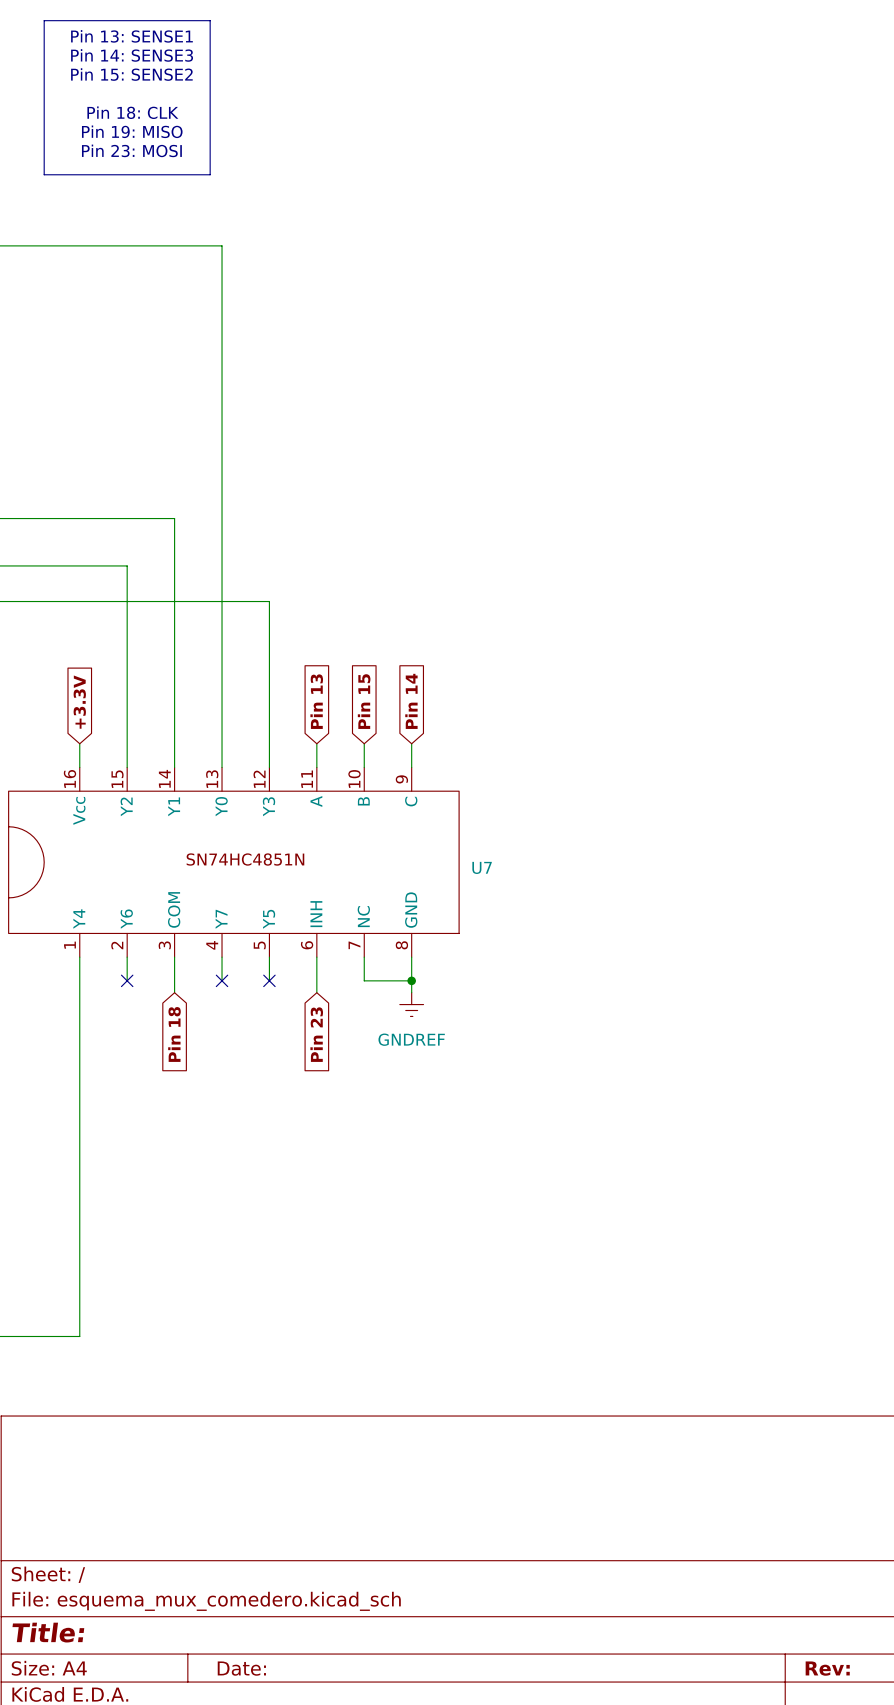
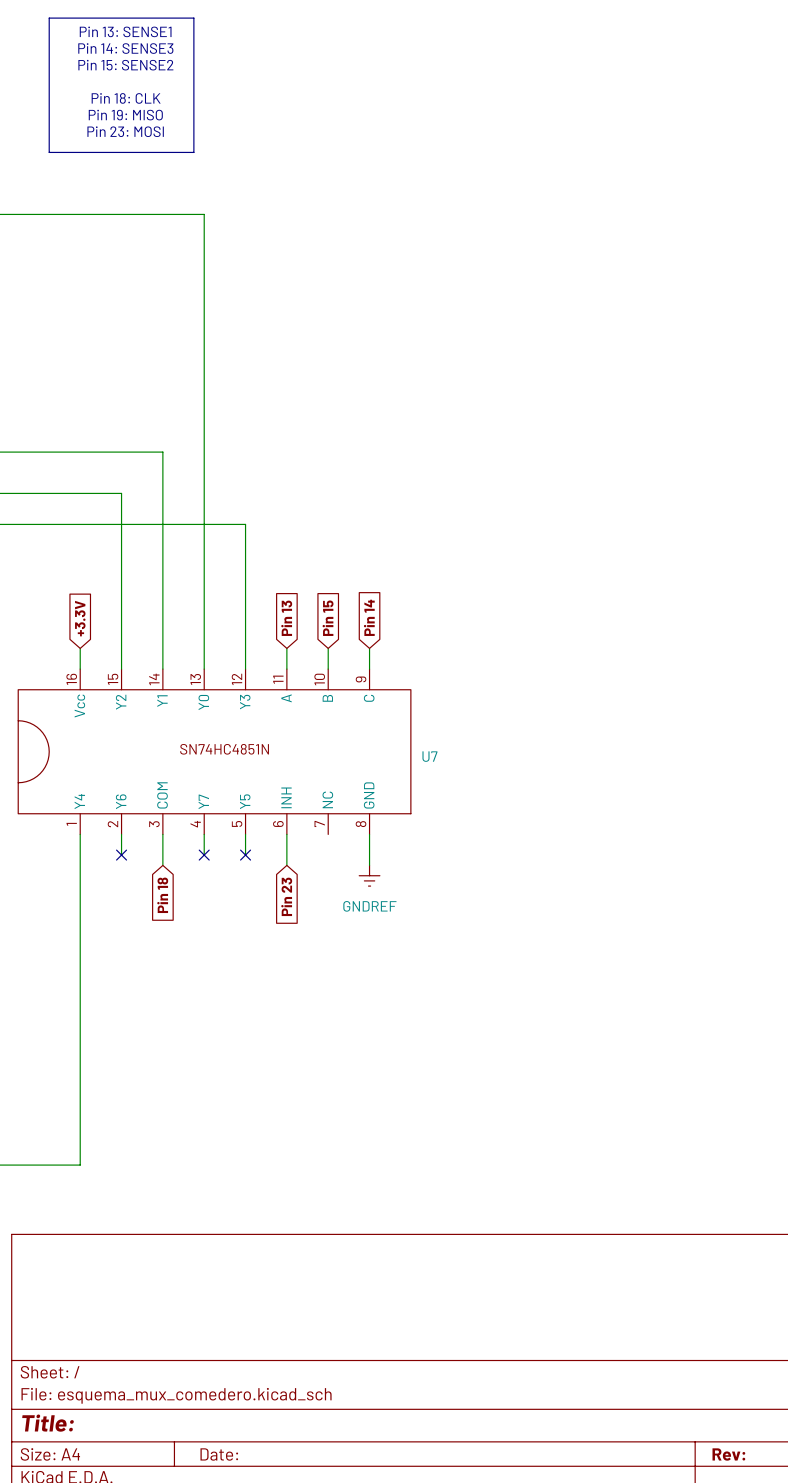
wire: (364, 957) (364, 980) (411, 980) -> none
junction: (411, 980) -> none

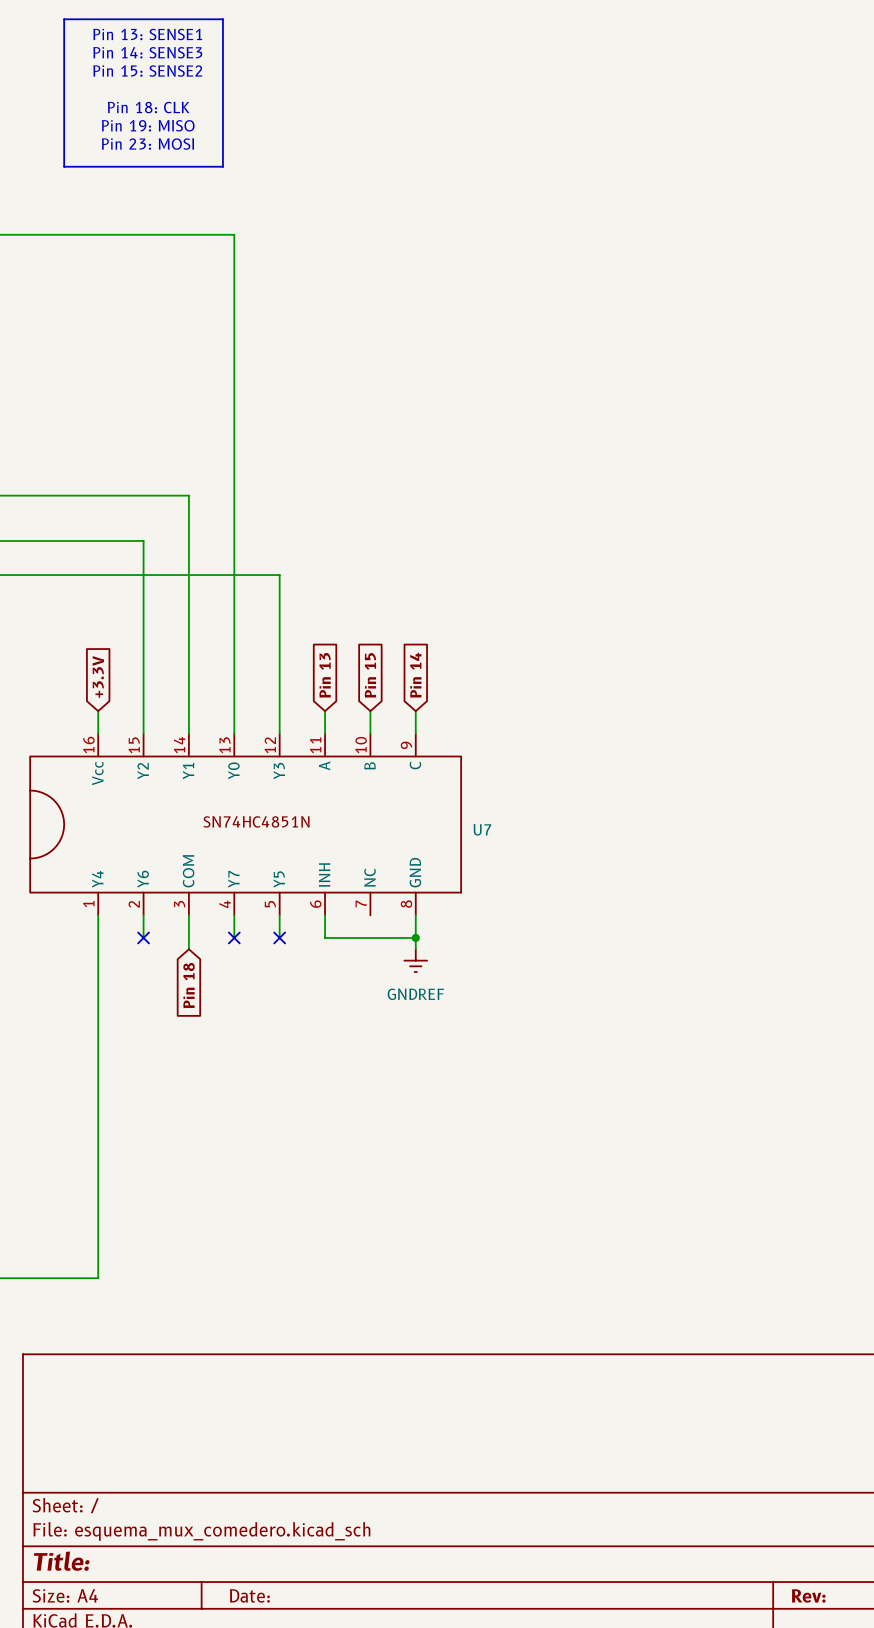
wire: (286, 855) (286, 865) -> (325, 937) (415, 937)
junction: none -> (415, 937)
global label: Pin 23 (286, 896) -> none

